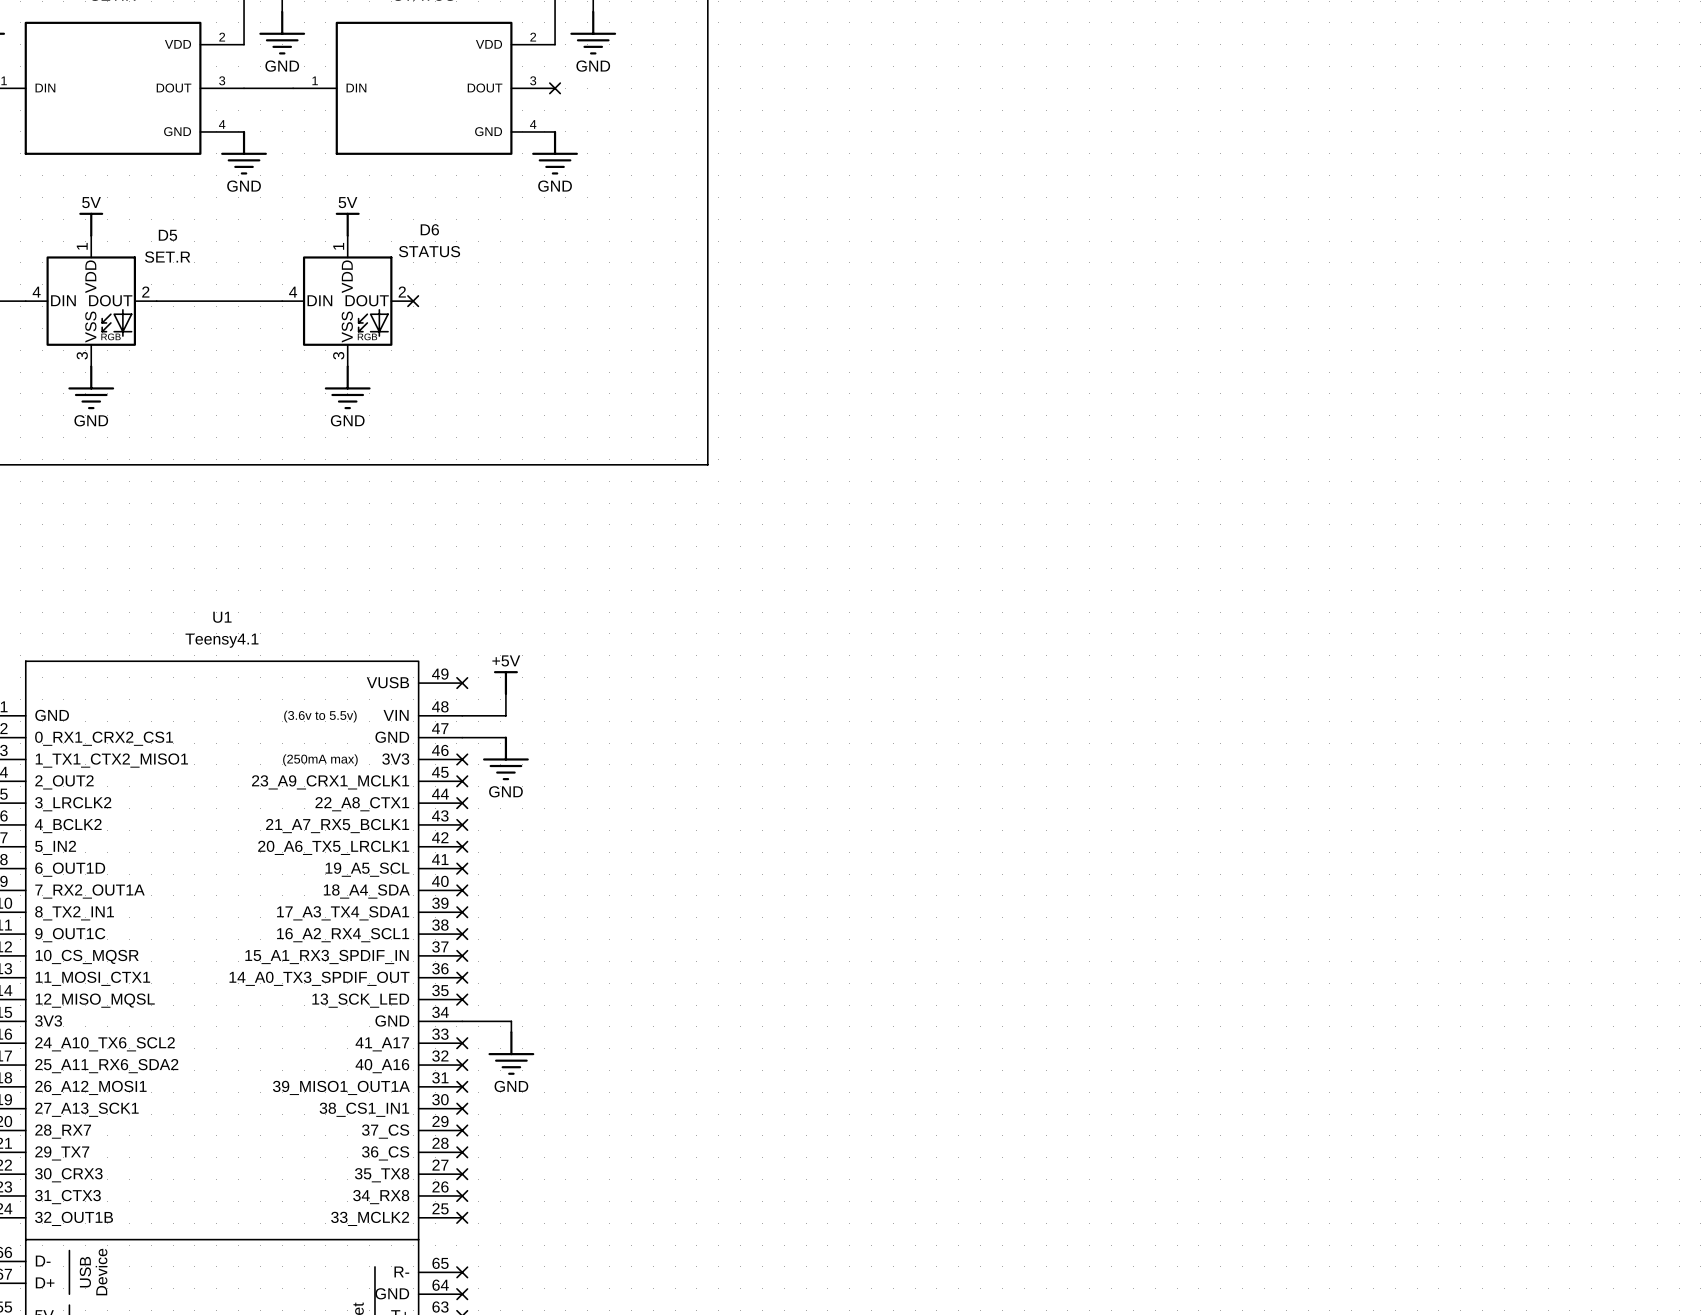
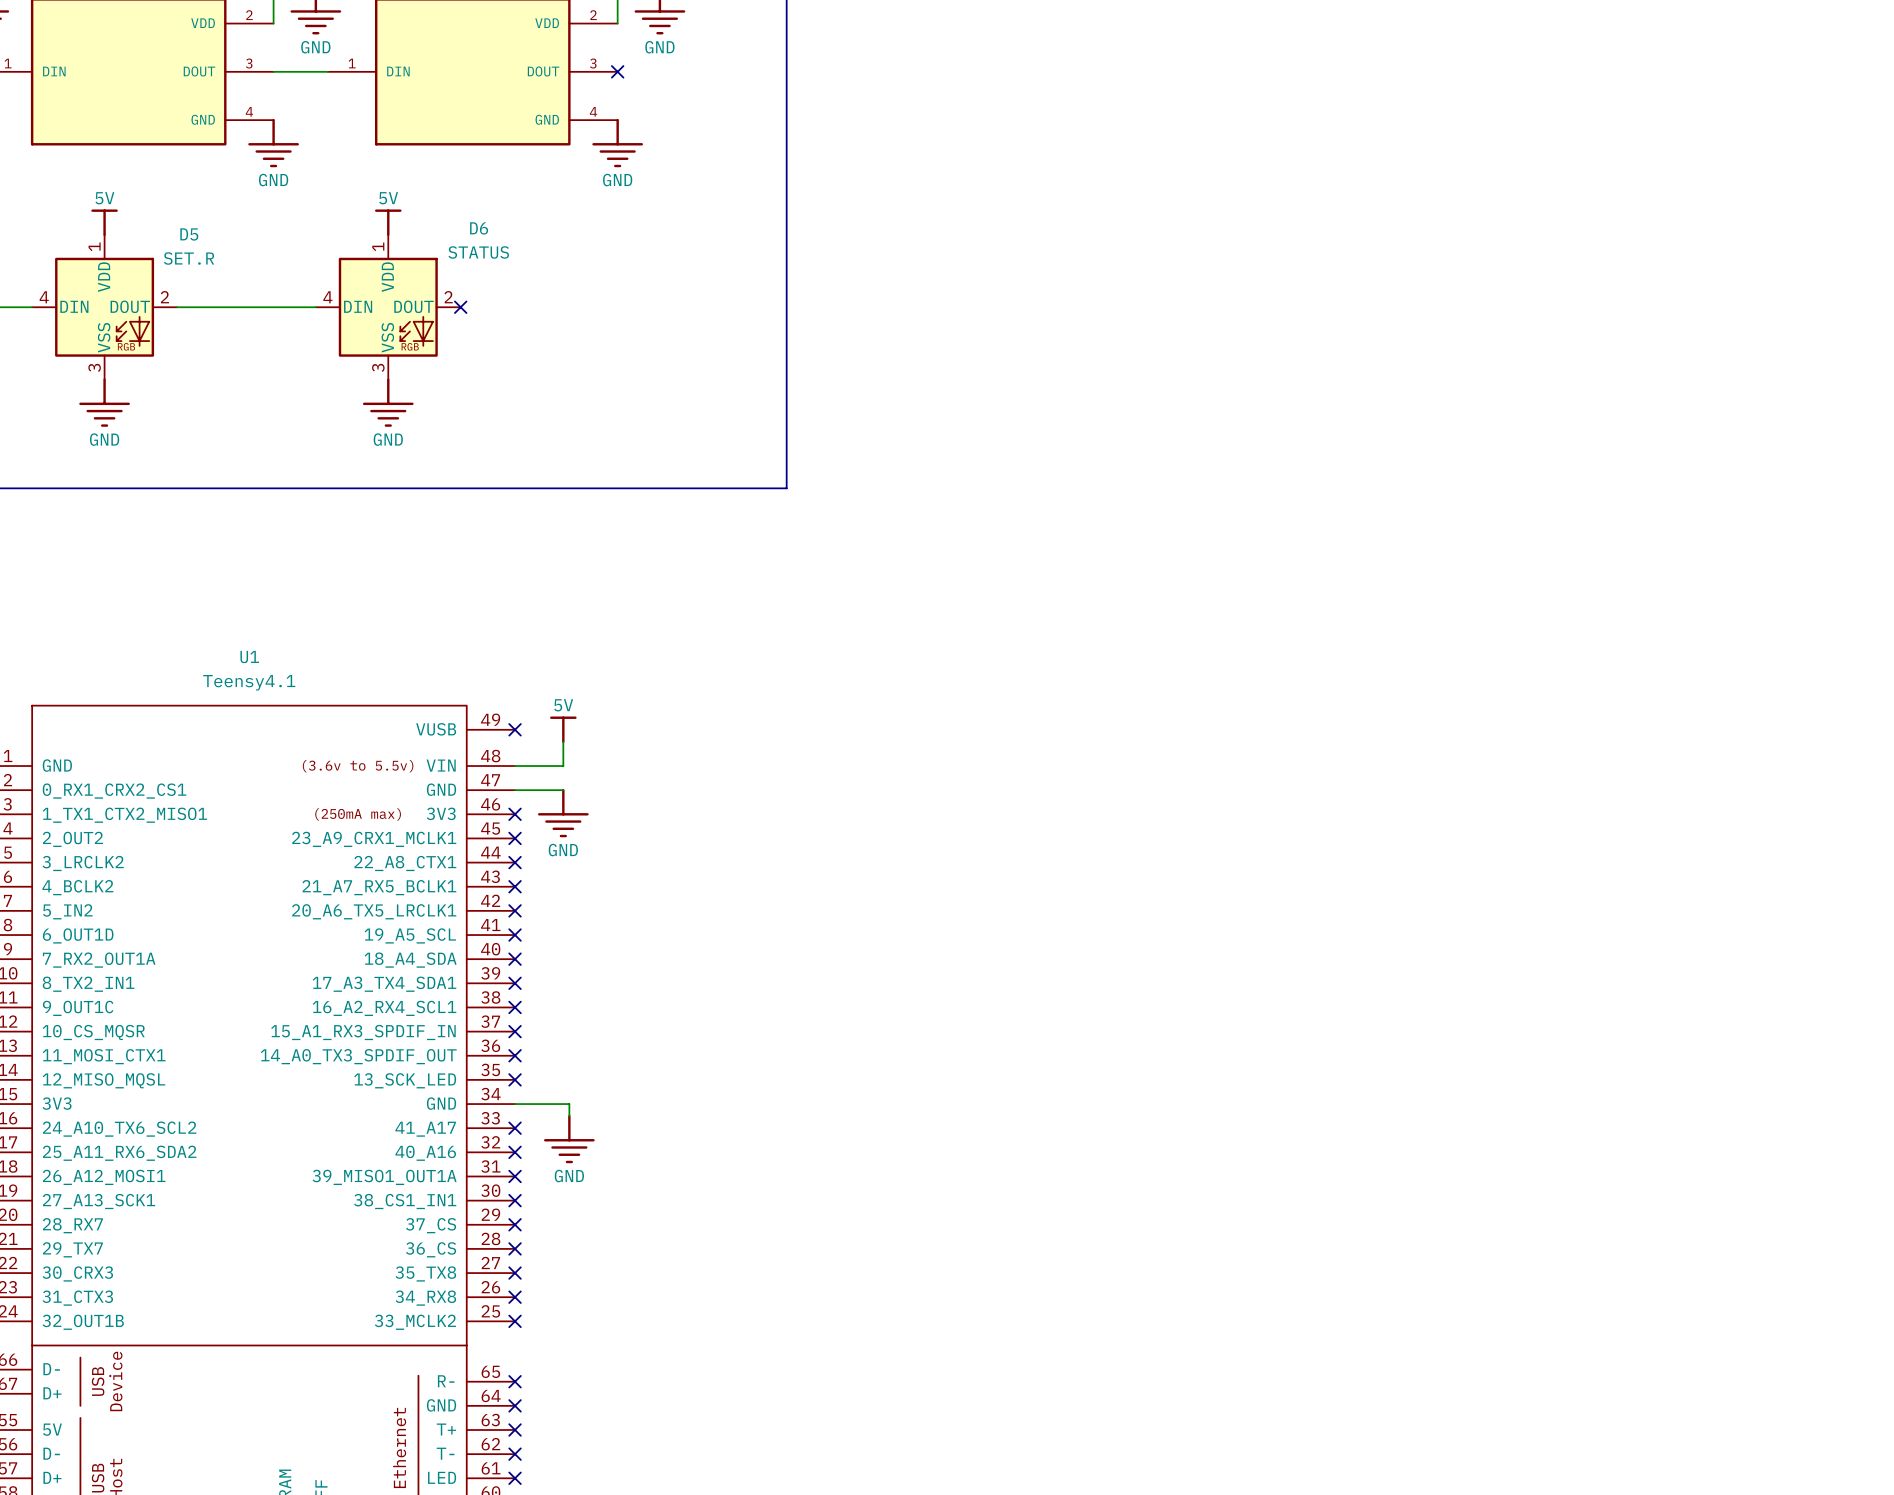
power symbol: +5V (505, 683) -> 5V (563, 729)

